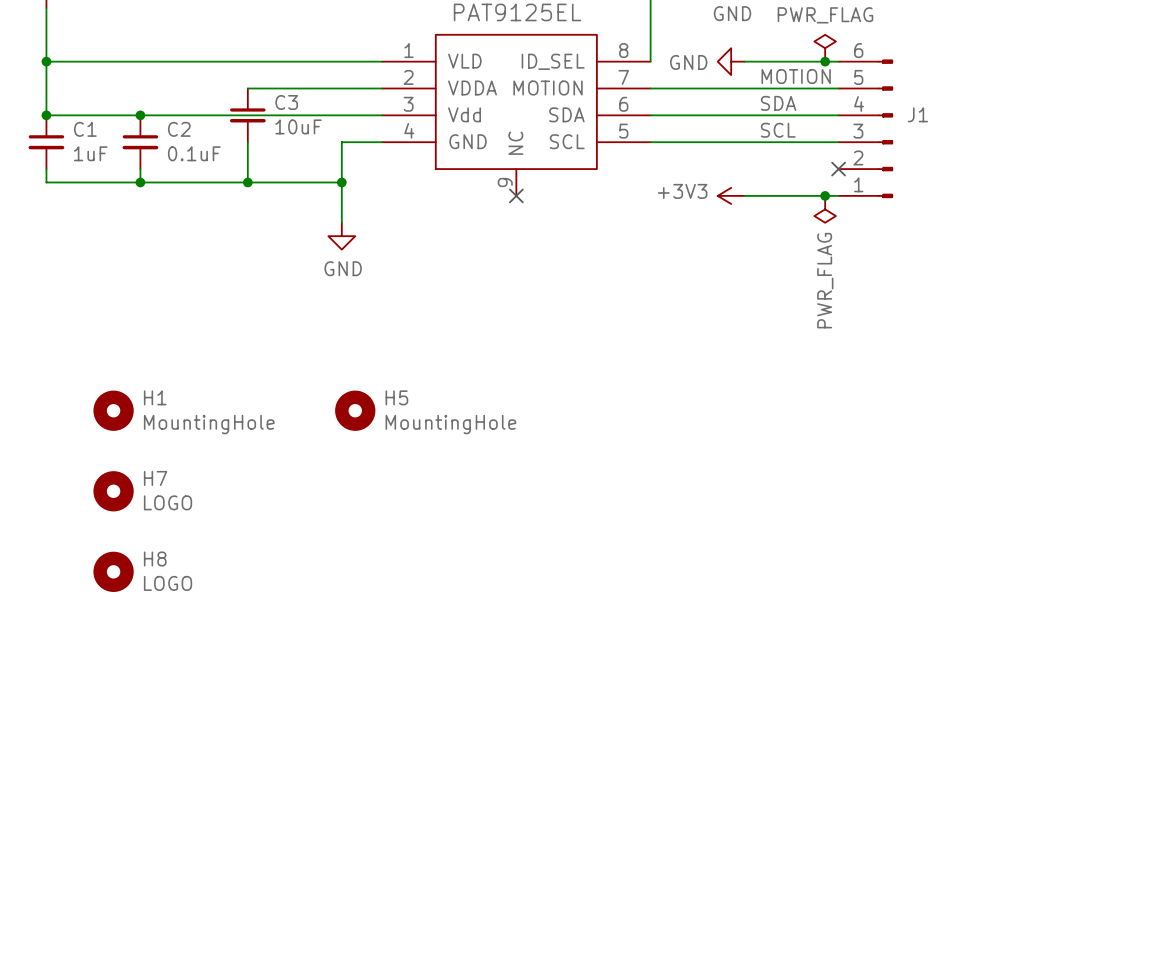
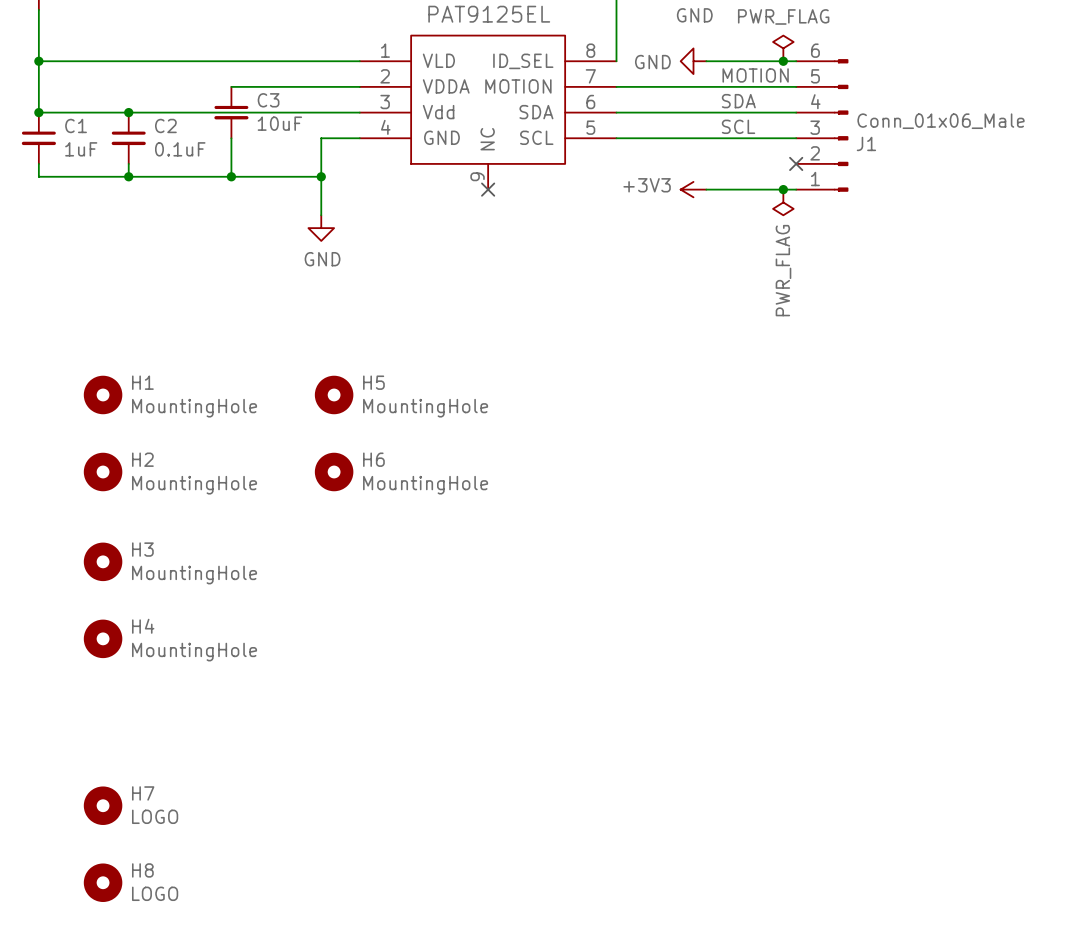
J1 name position: J1 (917, 114) -> J1 (866, 143)
J1 value: none -> Conn_01x06_Male (941, 121)
H7 name: H7 (155, 478) -> H2 (142, 459)
H6: none -> MountingHole (334, 471)
H7 value: LOGO (168, 502) -> MountingHole (194, 485)
H8 position: (113, 571) -> (103, 882)
H3: none -> MountingHole (103, 561)
H4: none -> MountingHole (103, 638)
H7: none -> LOGO (103, 805)

